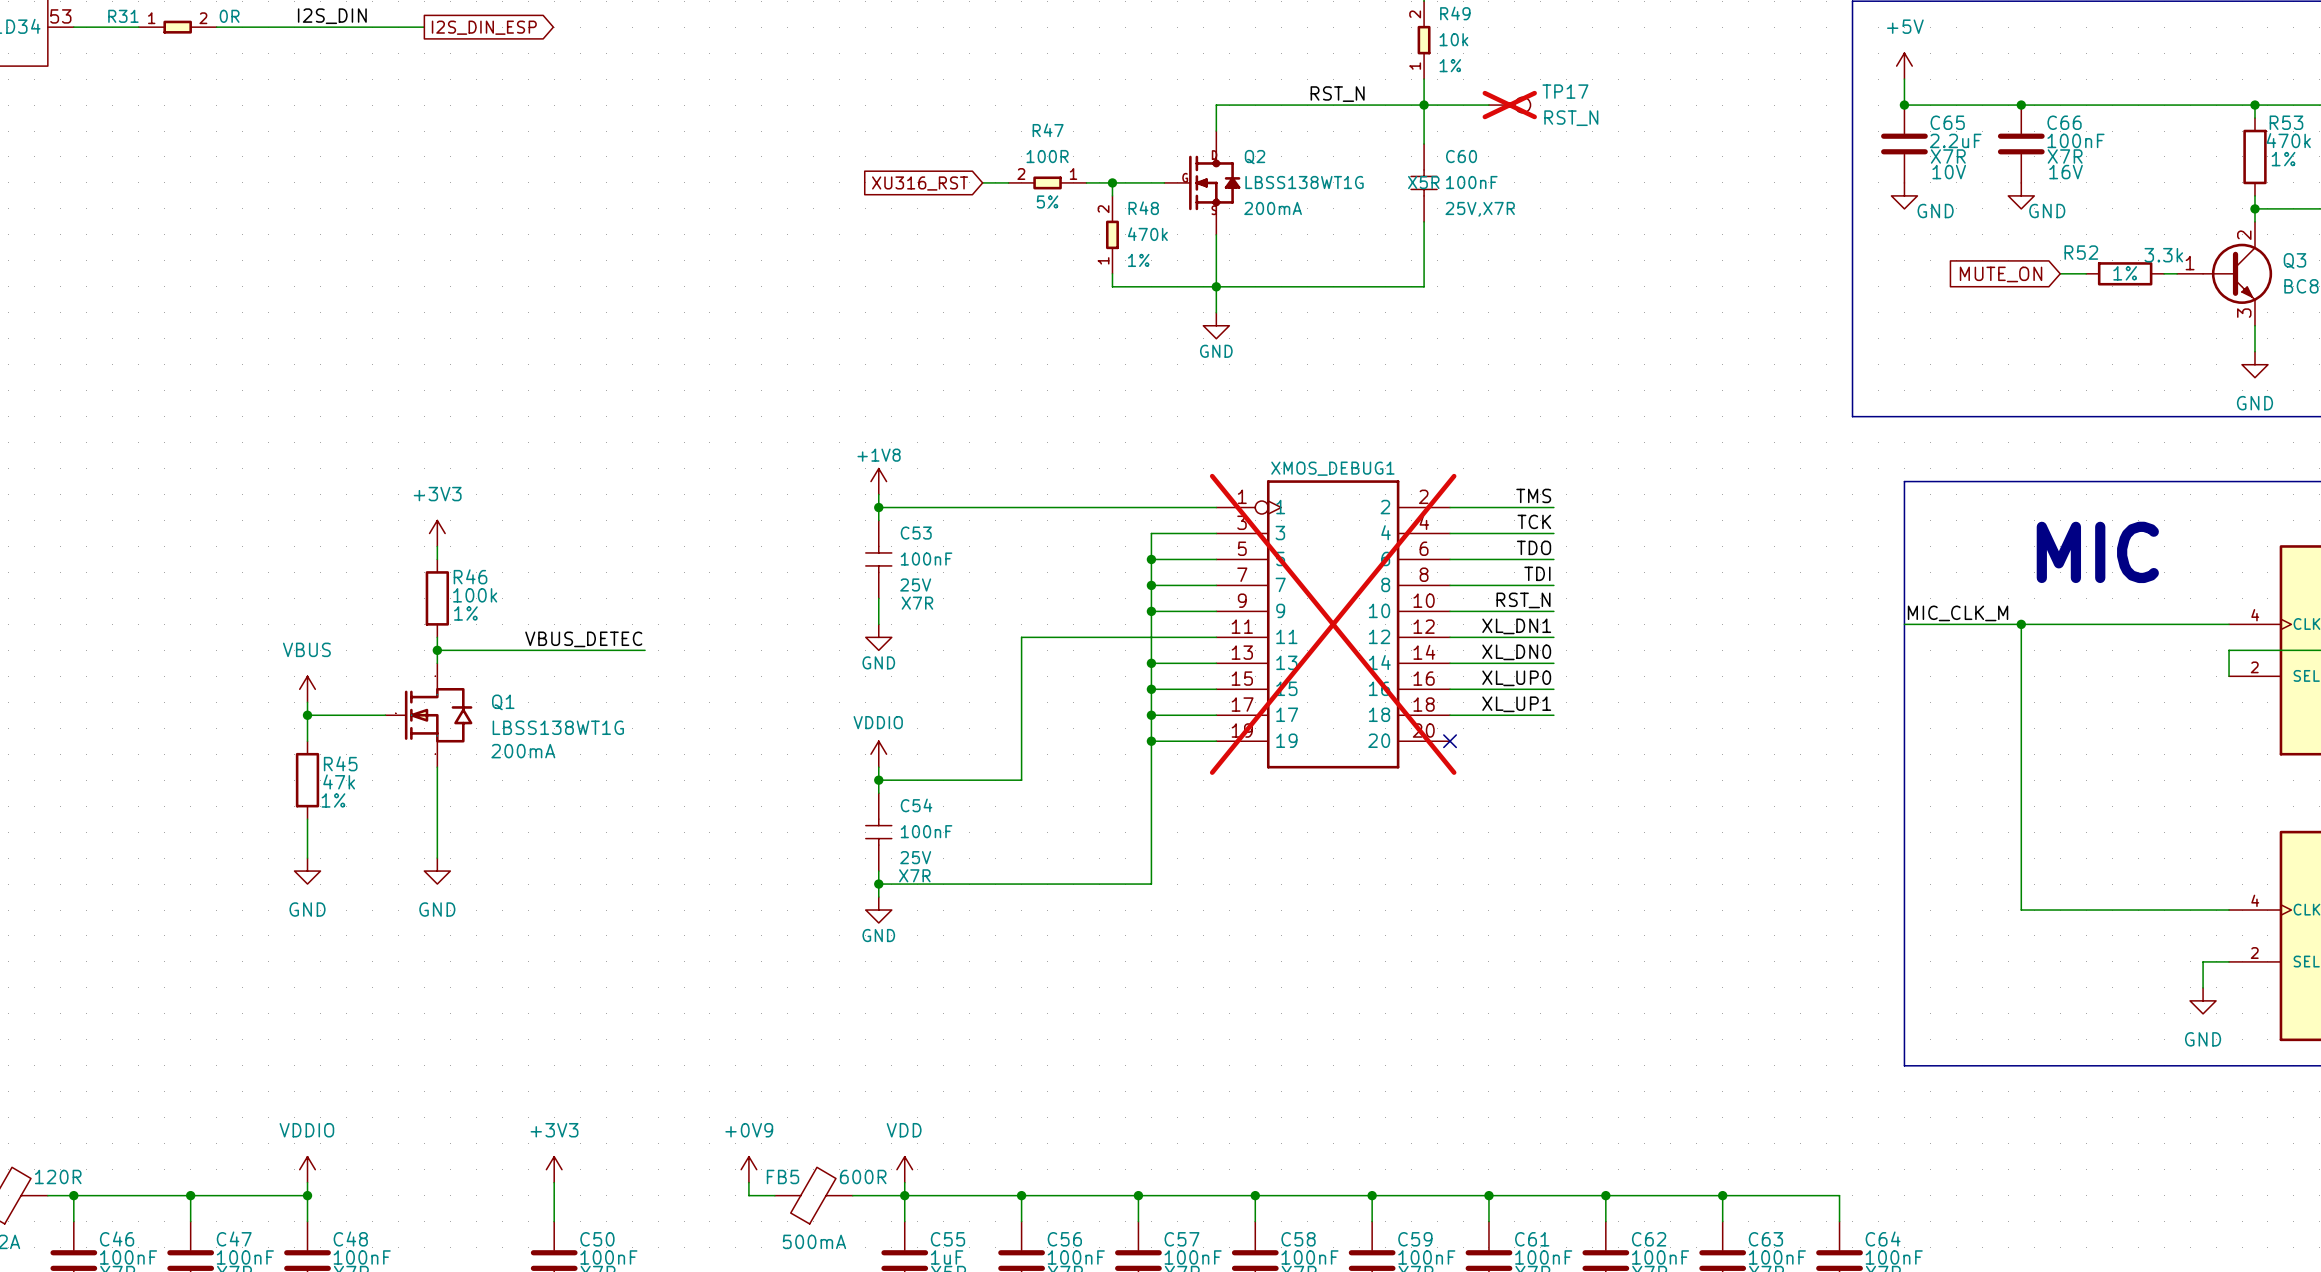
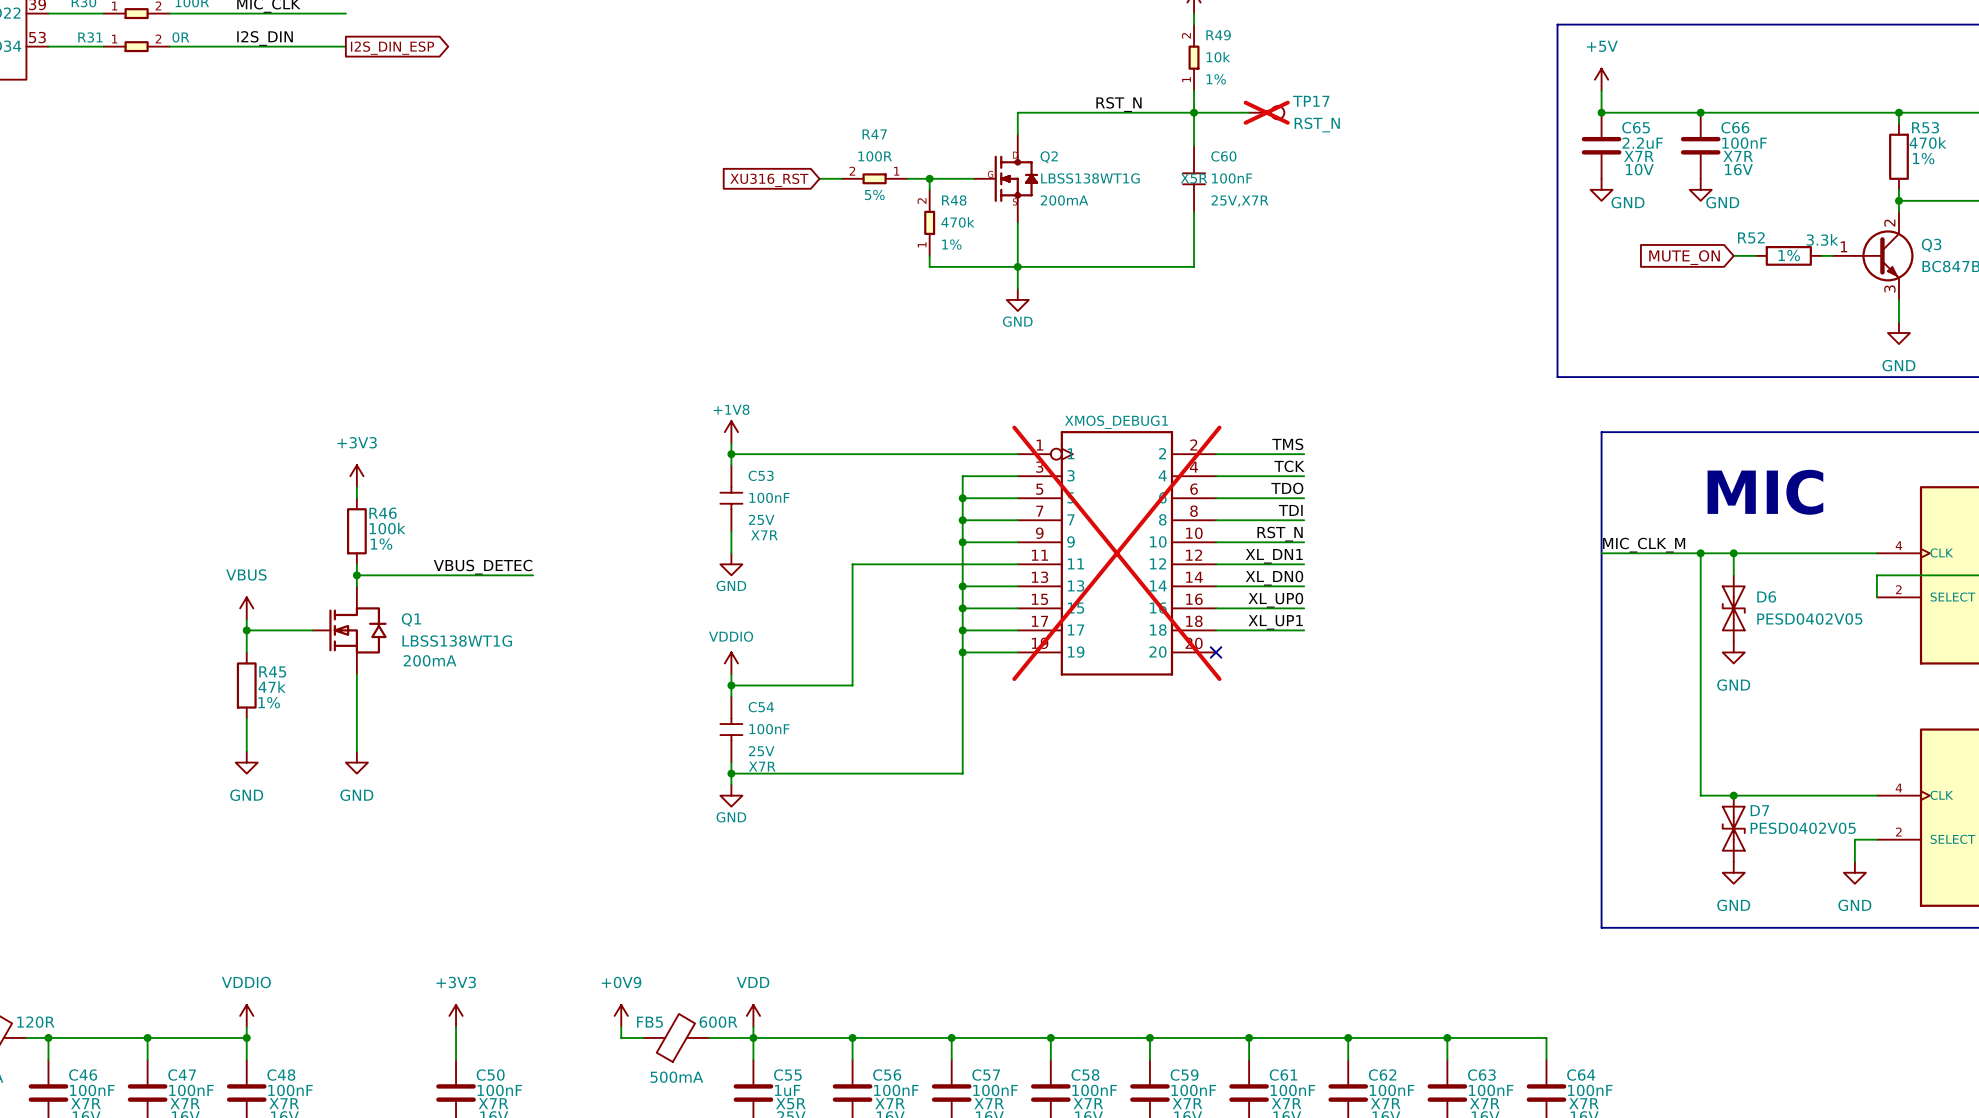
wire: none -> (1733, 553) (1733, 575)
junction: none -> (1733, 553)
D6: none -> PESD0402V05 (1733, 608)
power symbol: none -> GND (1733, 652)
junction: none -> (1733, 795)
D7: none -> PESD0402V05 (1733, 828)
power symbol: none -> GND (1733, 872)

